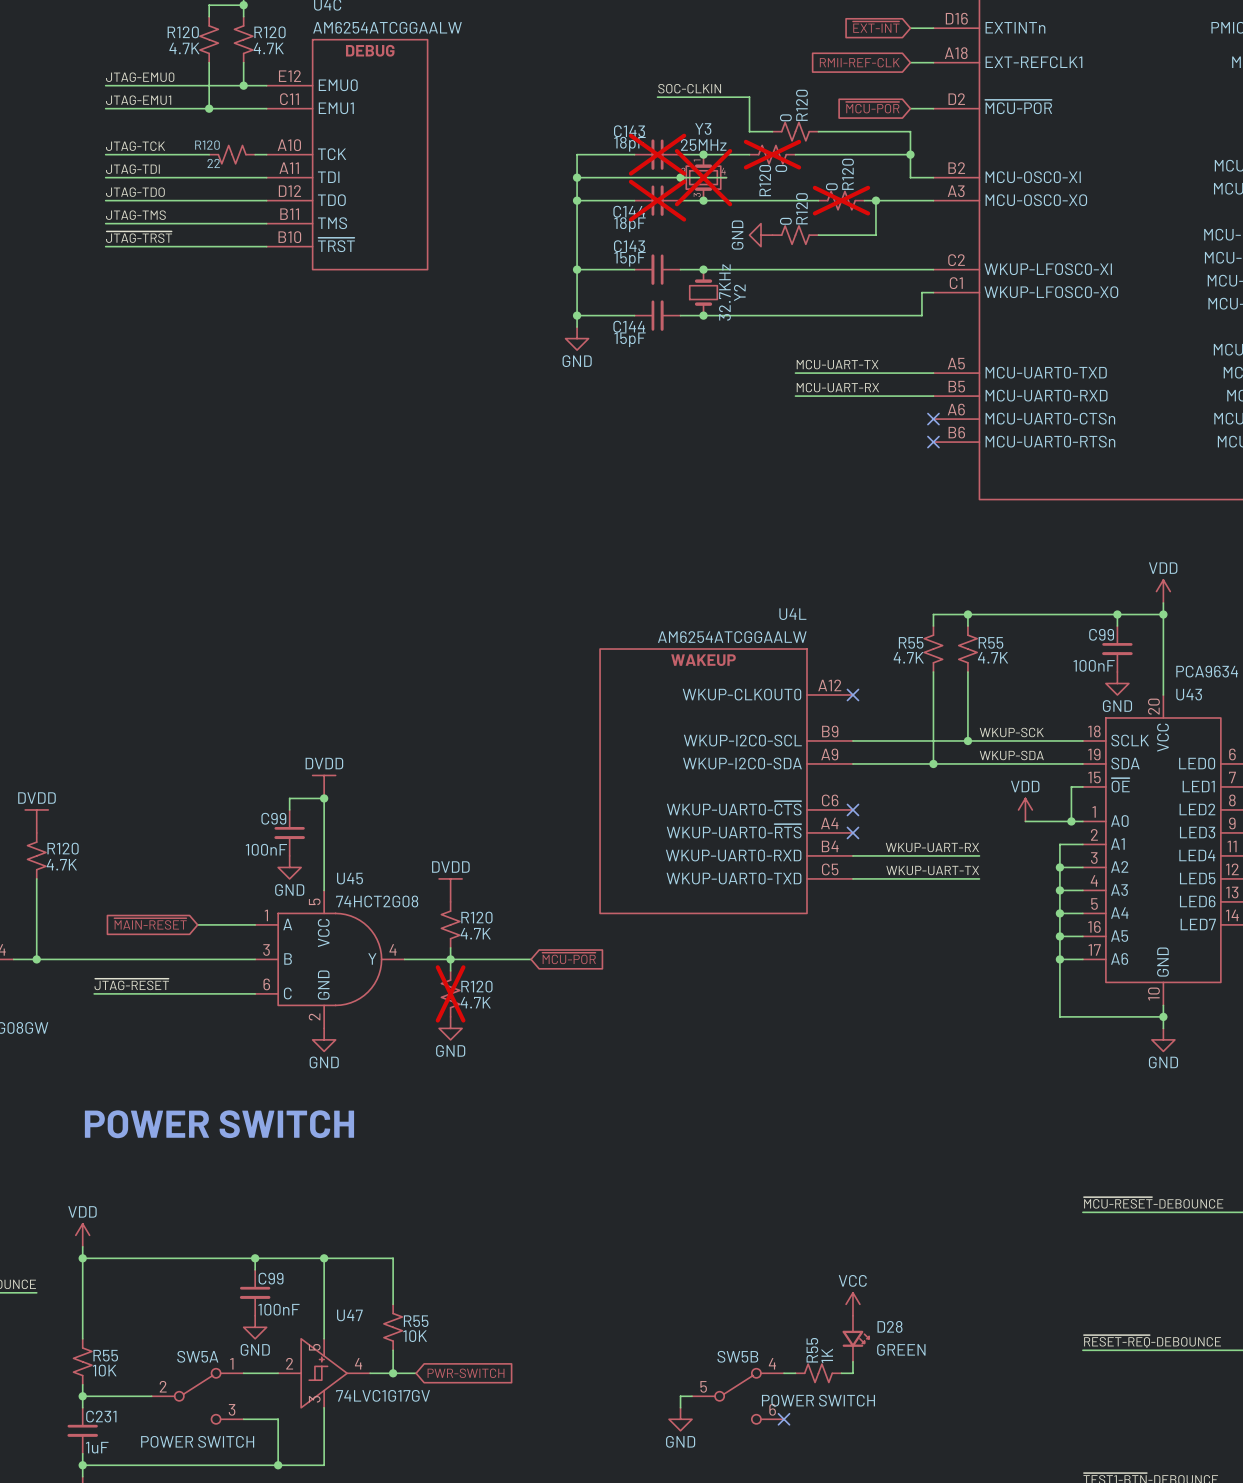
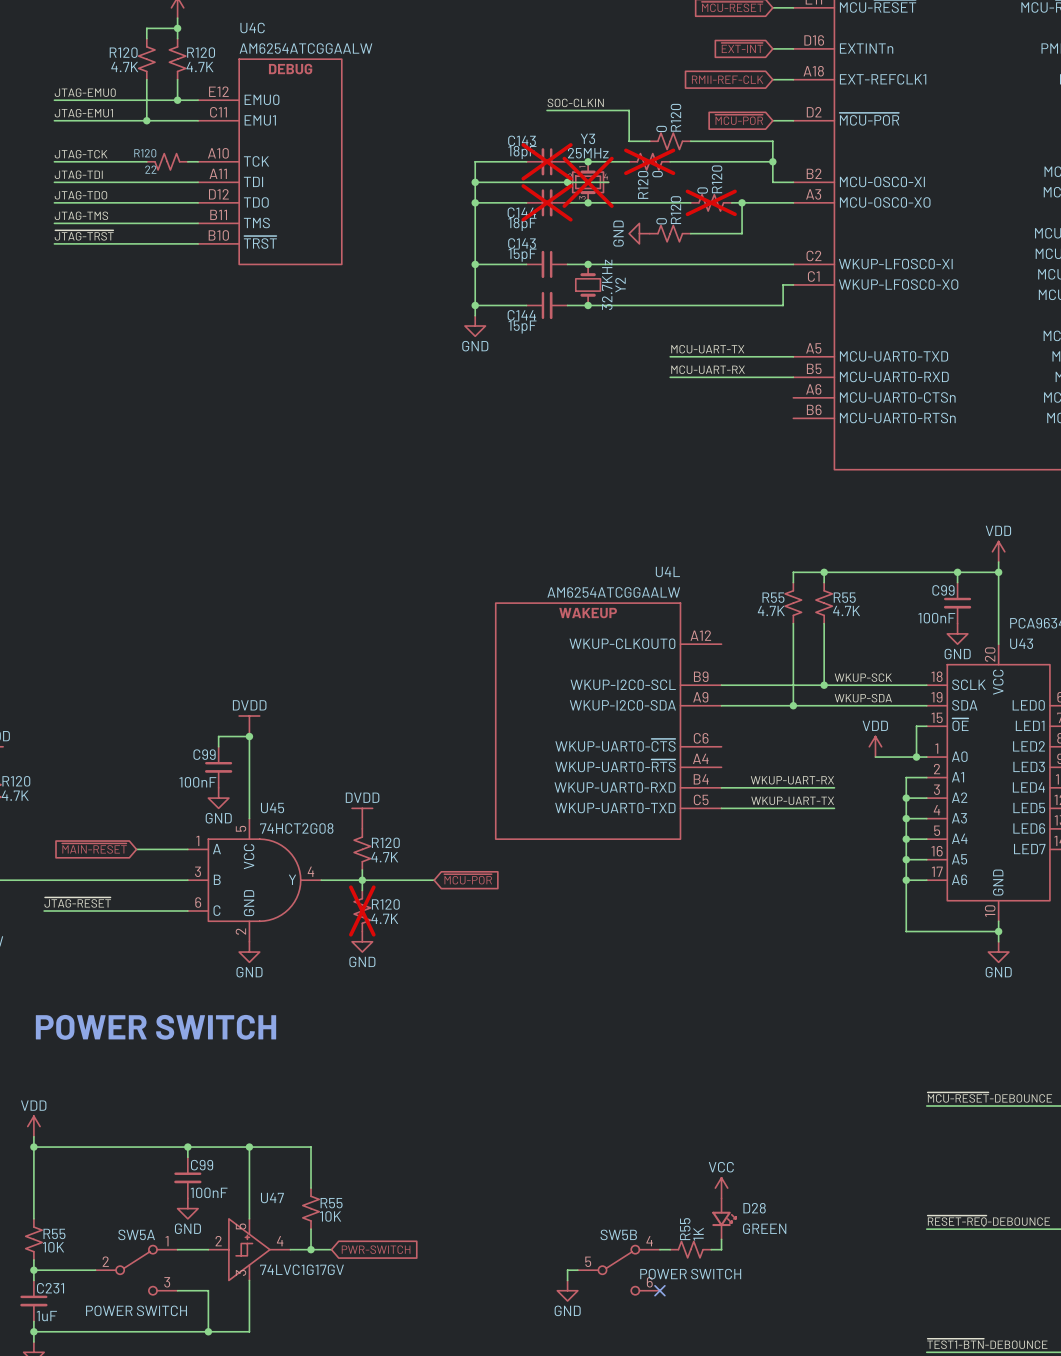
no-connect mark: (933, 419) -> none
no-connect mark: (933, 442) -> none
no-connect mark: (852, 694) -> none
no-connect mark: (852, 809) -> none
no-connect mark: (852, 832) -> none

